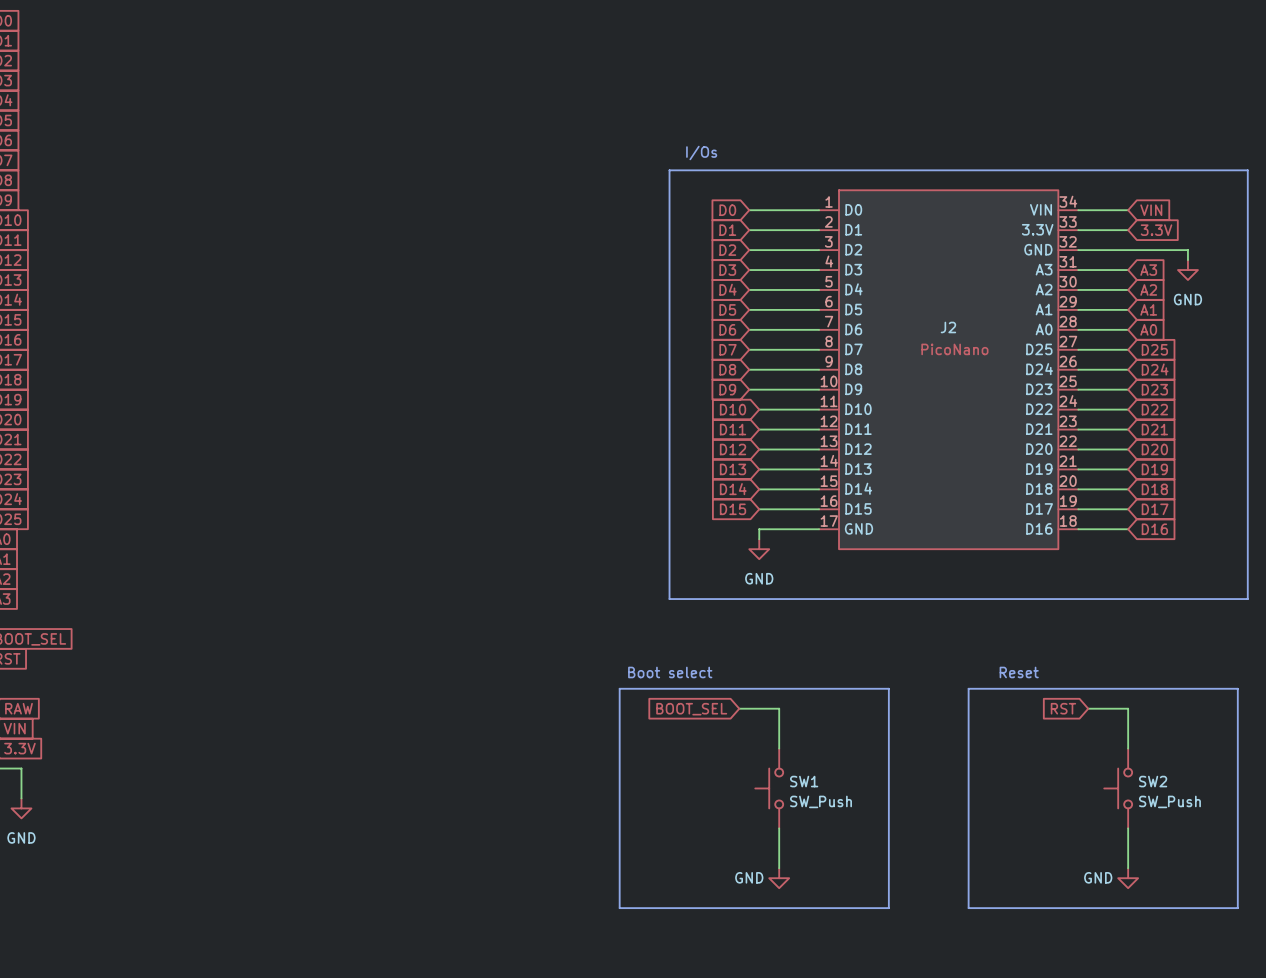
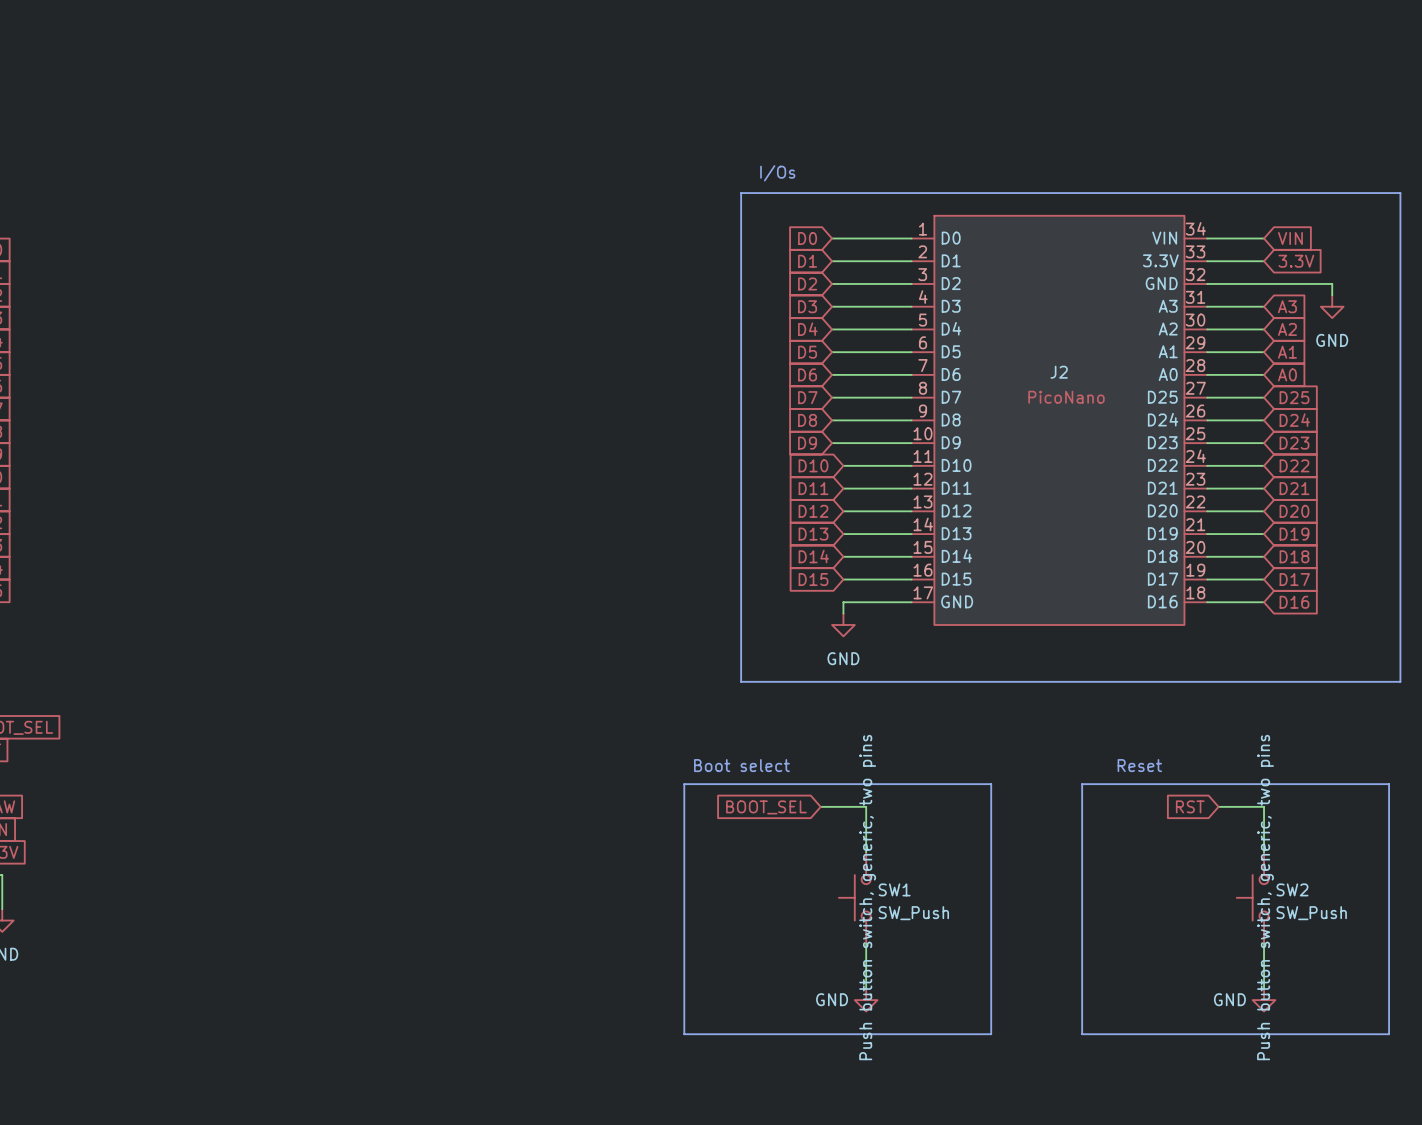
SW1 text: none -> Push button switch, generic, two pins (867, 897)
SW2 text: none -> Push button switch, generic, two pins (1265, 897)

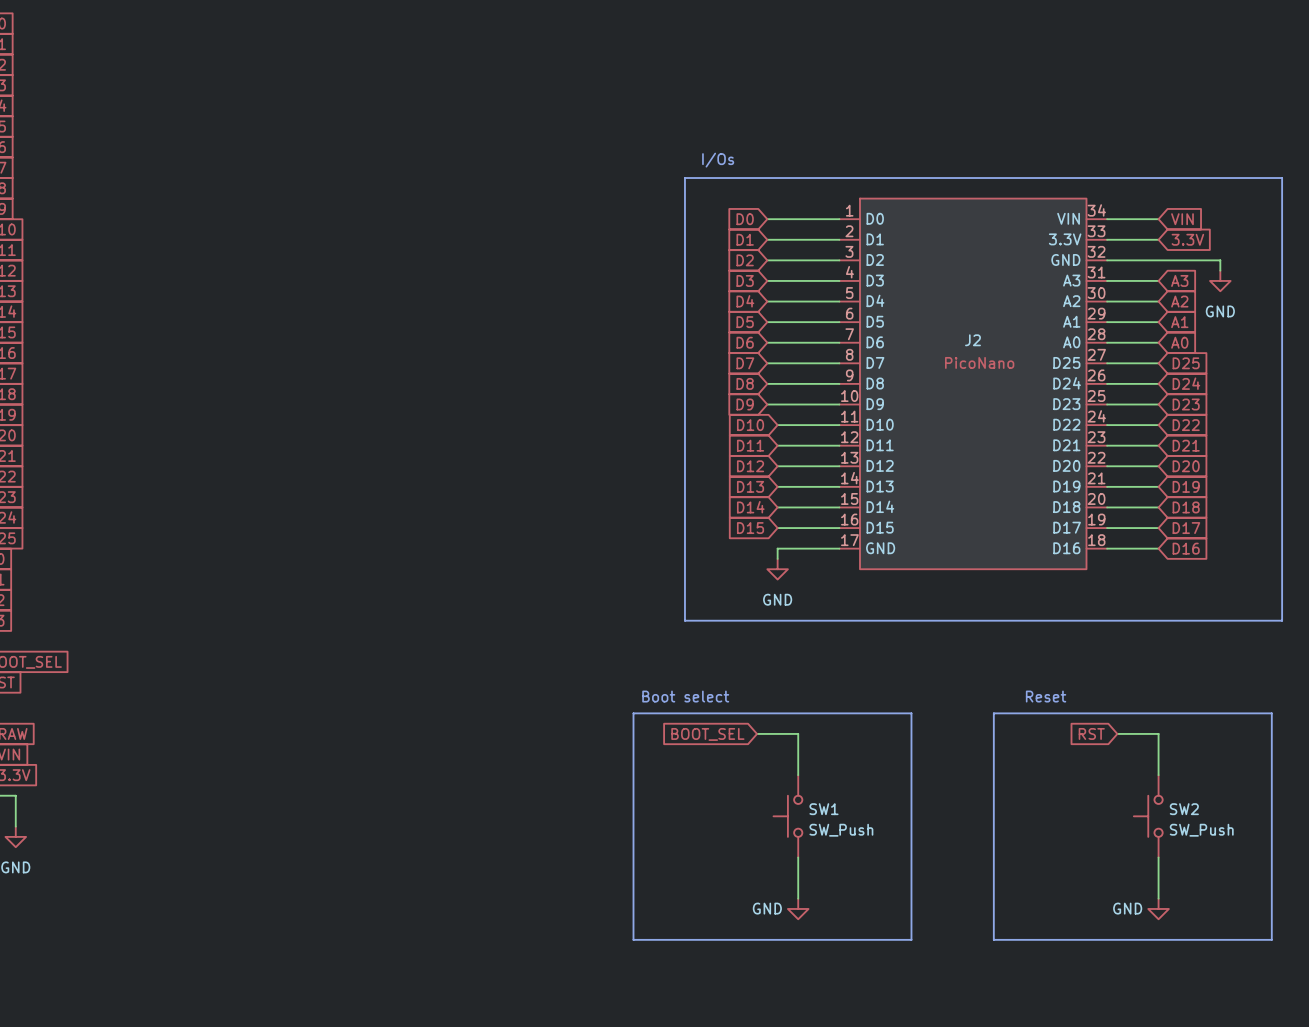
SW1 text: Push button switch, generic, two pins (867, 897) -> none
SW2 text: Push button switch, generic, two pins (1265, 897) -> none

